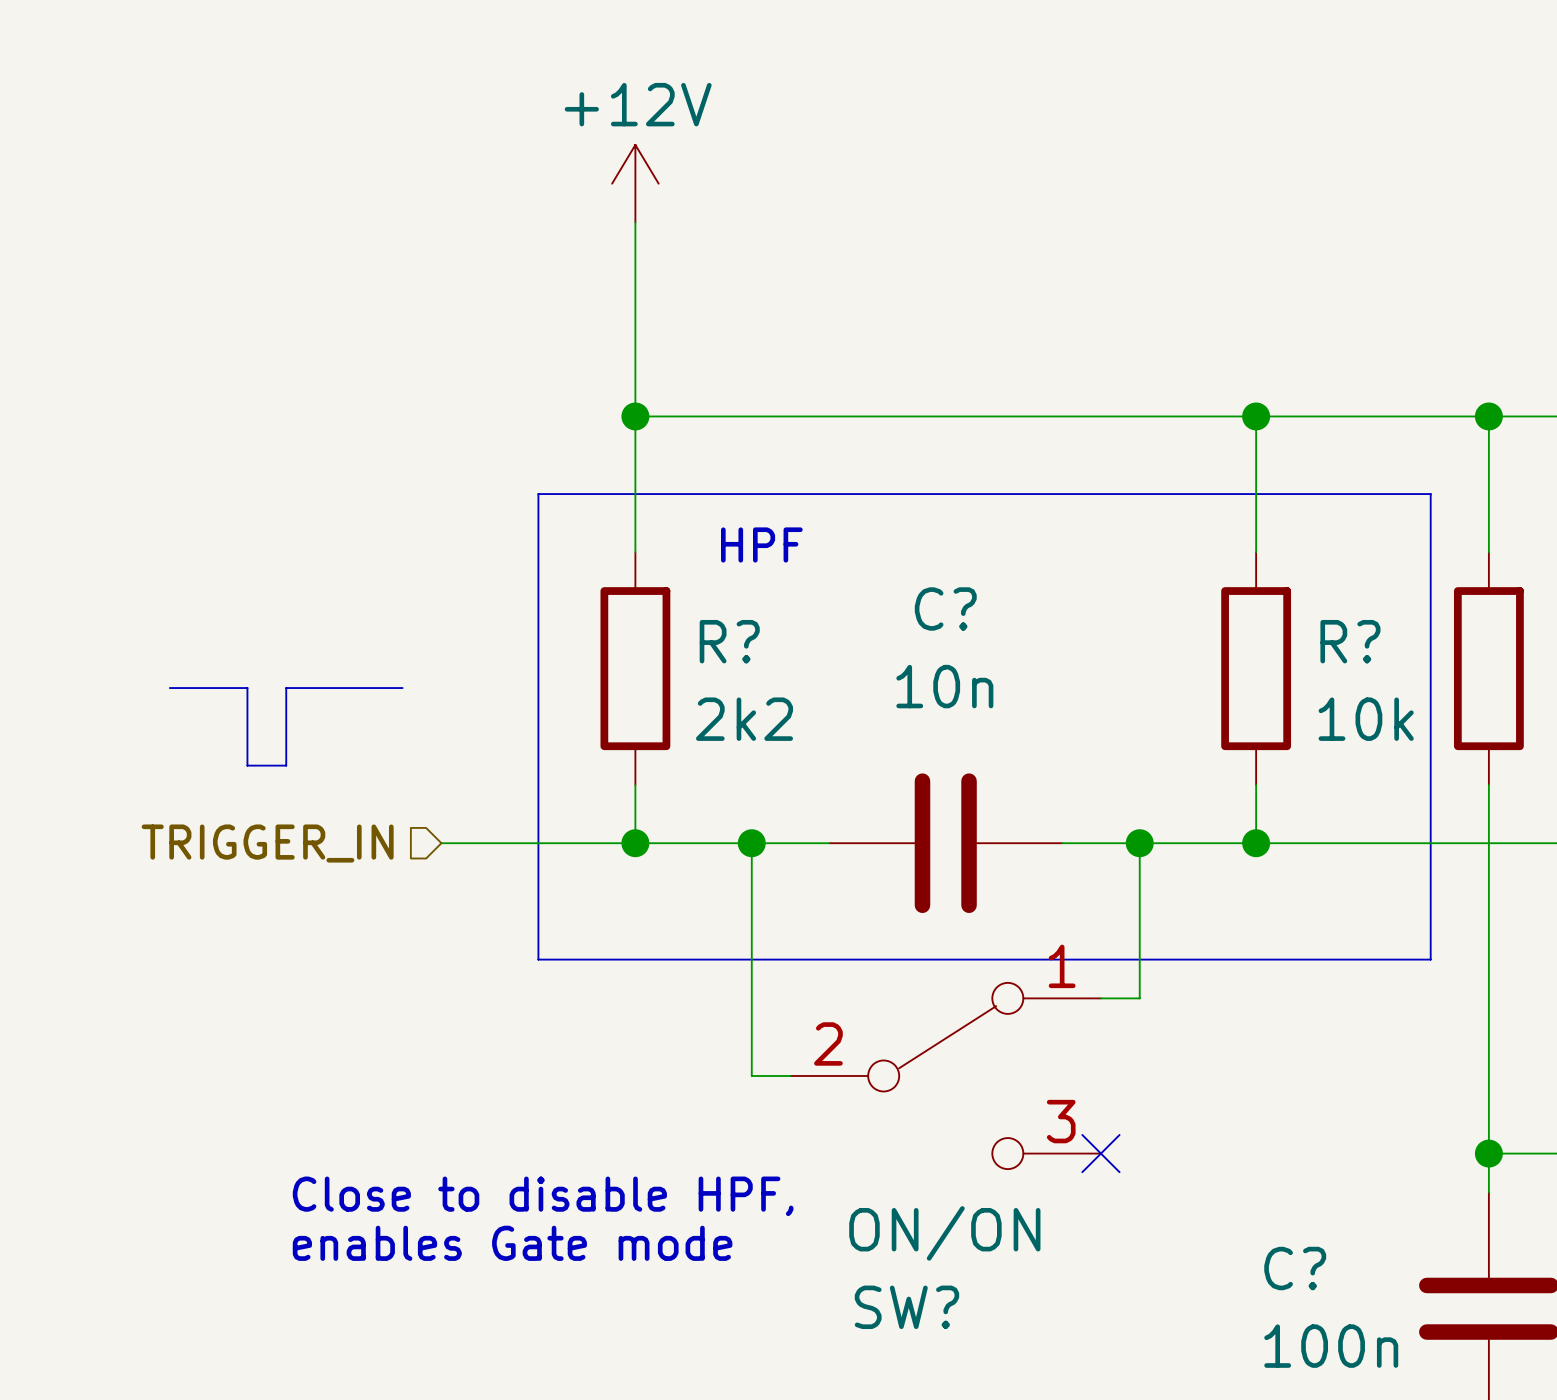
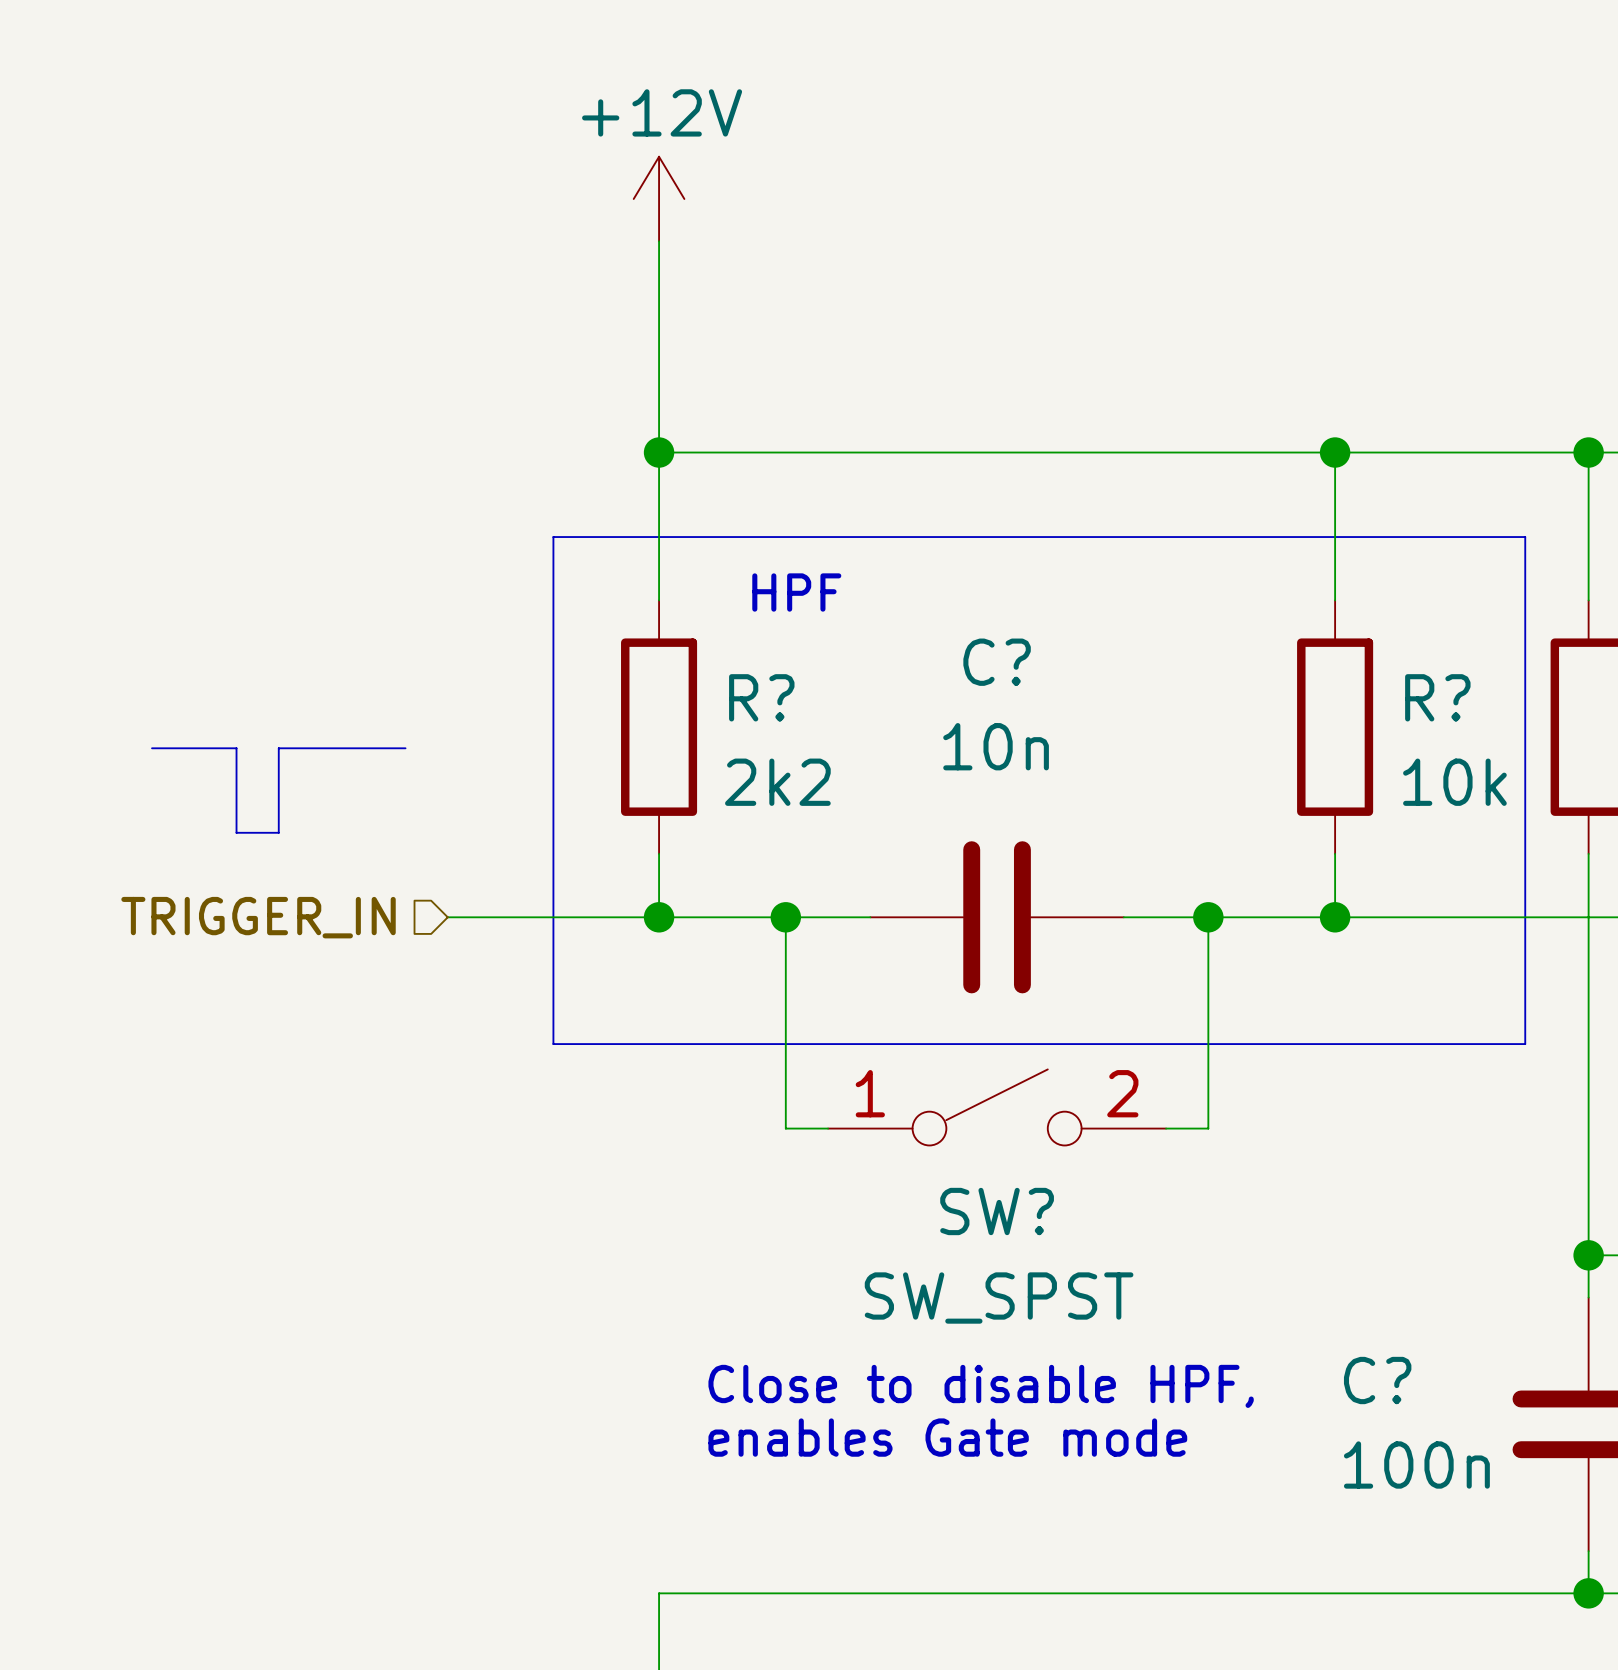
wire: (1100, 998) (1139, 998) -> (1166, 1128) (1208, 1128) (1208, 1086)
SW?: none -> SW_SPST (997, 1107)
wire: (751, 1037) (751, 1075) (790, 1075) -> (785, 1128) (828, 1128)
SW?: ON/ON (945, 1075) -> none
no-connect mark: (1100, 1153) -> none
text position: Close to disable HPF, (543, 1196) -> Close to disable HPF, (981, 1386)
text position: enables Gate mode (512, 1243) -> enables Gate mode (947, 1437)

